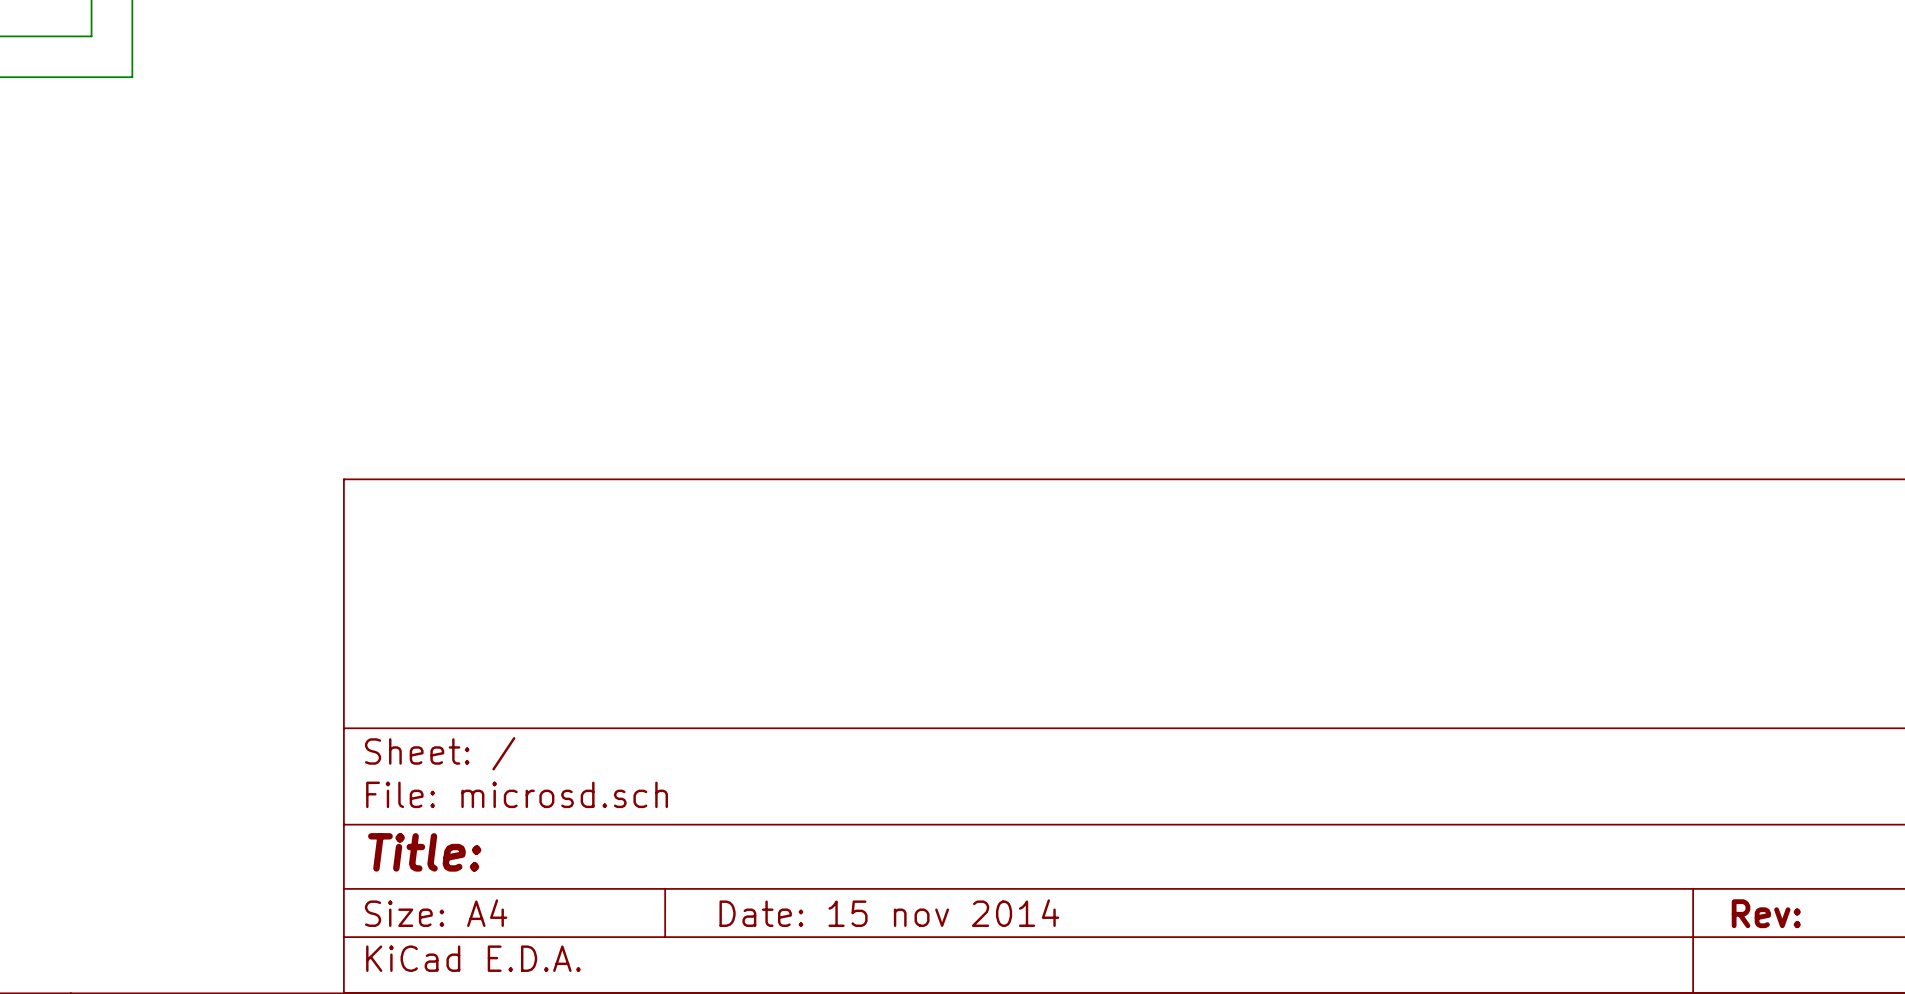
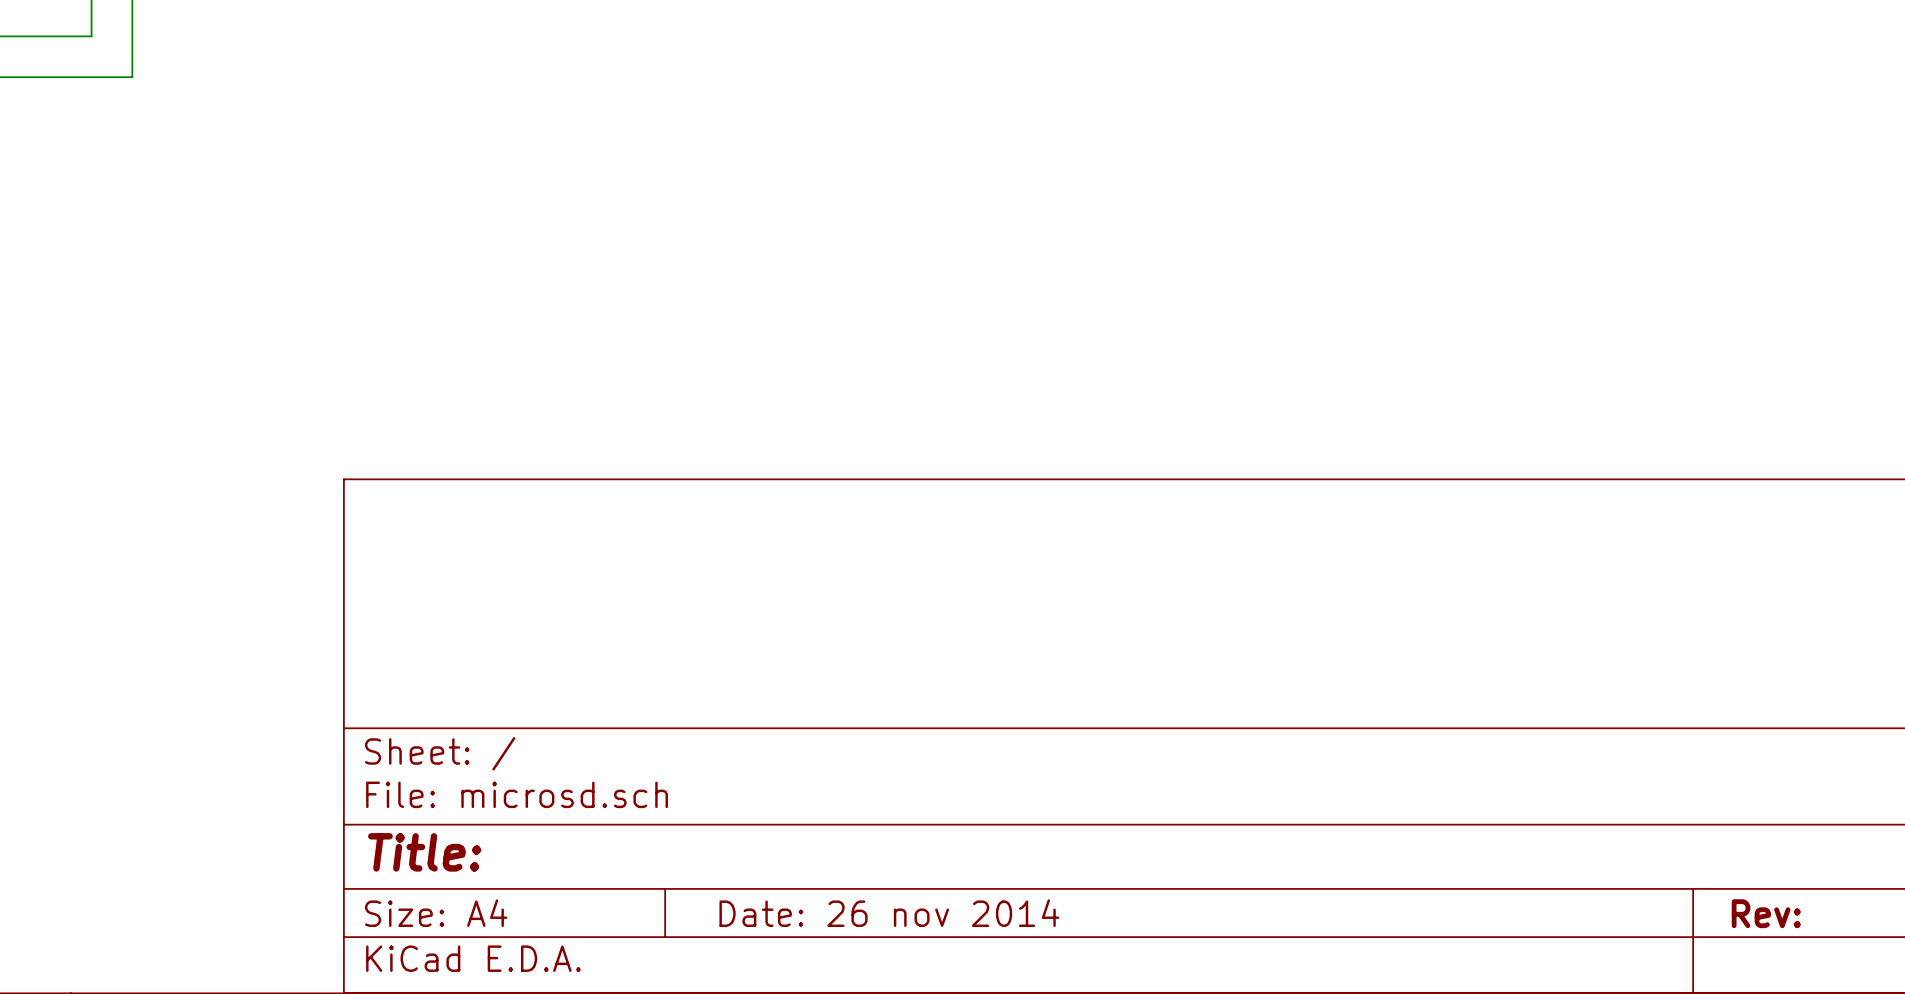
title block: Date: 15 nov 2014 (889, 913) -> Date: 26 nov 2014 (889, 913)

